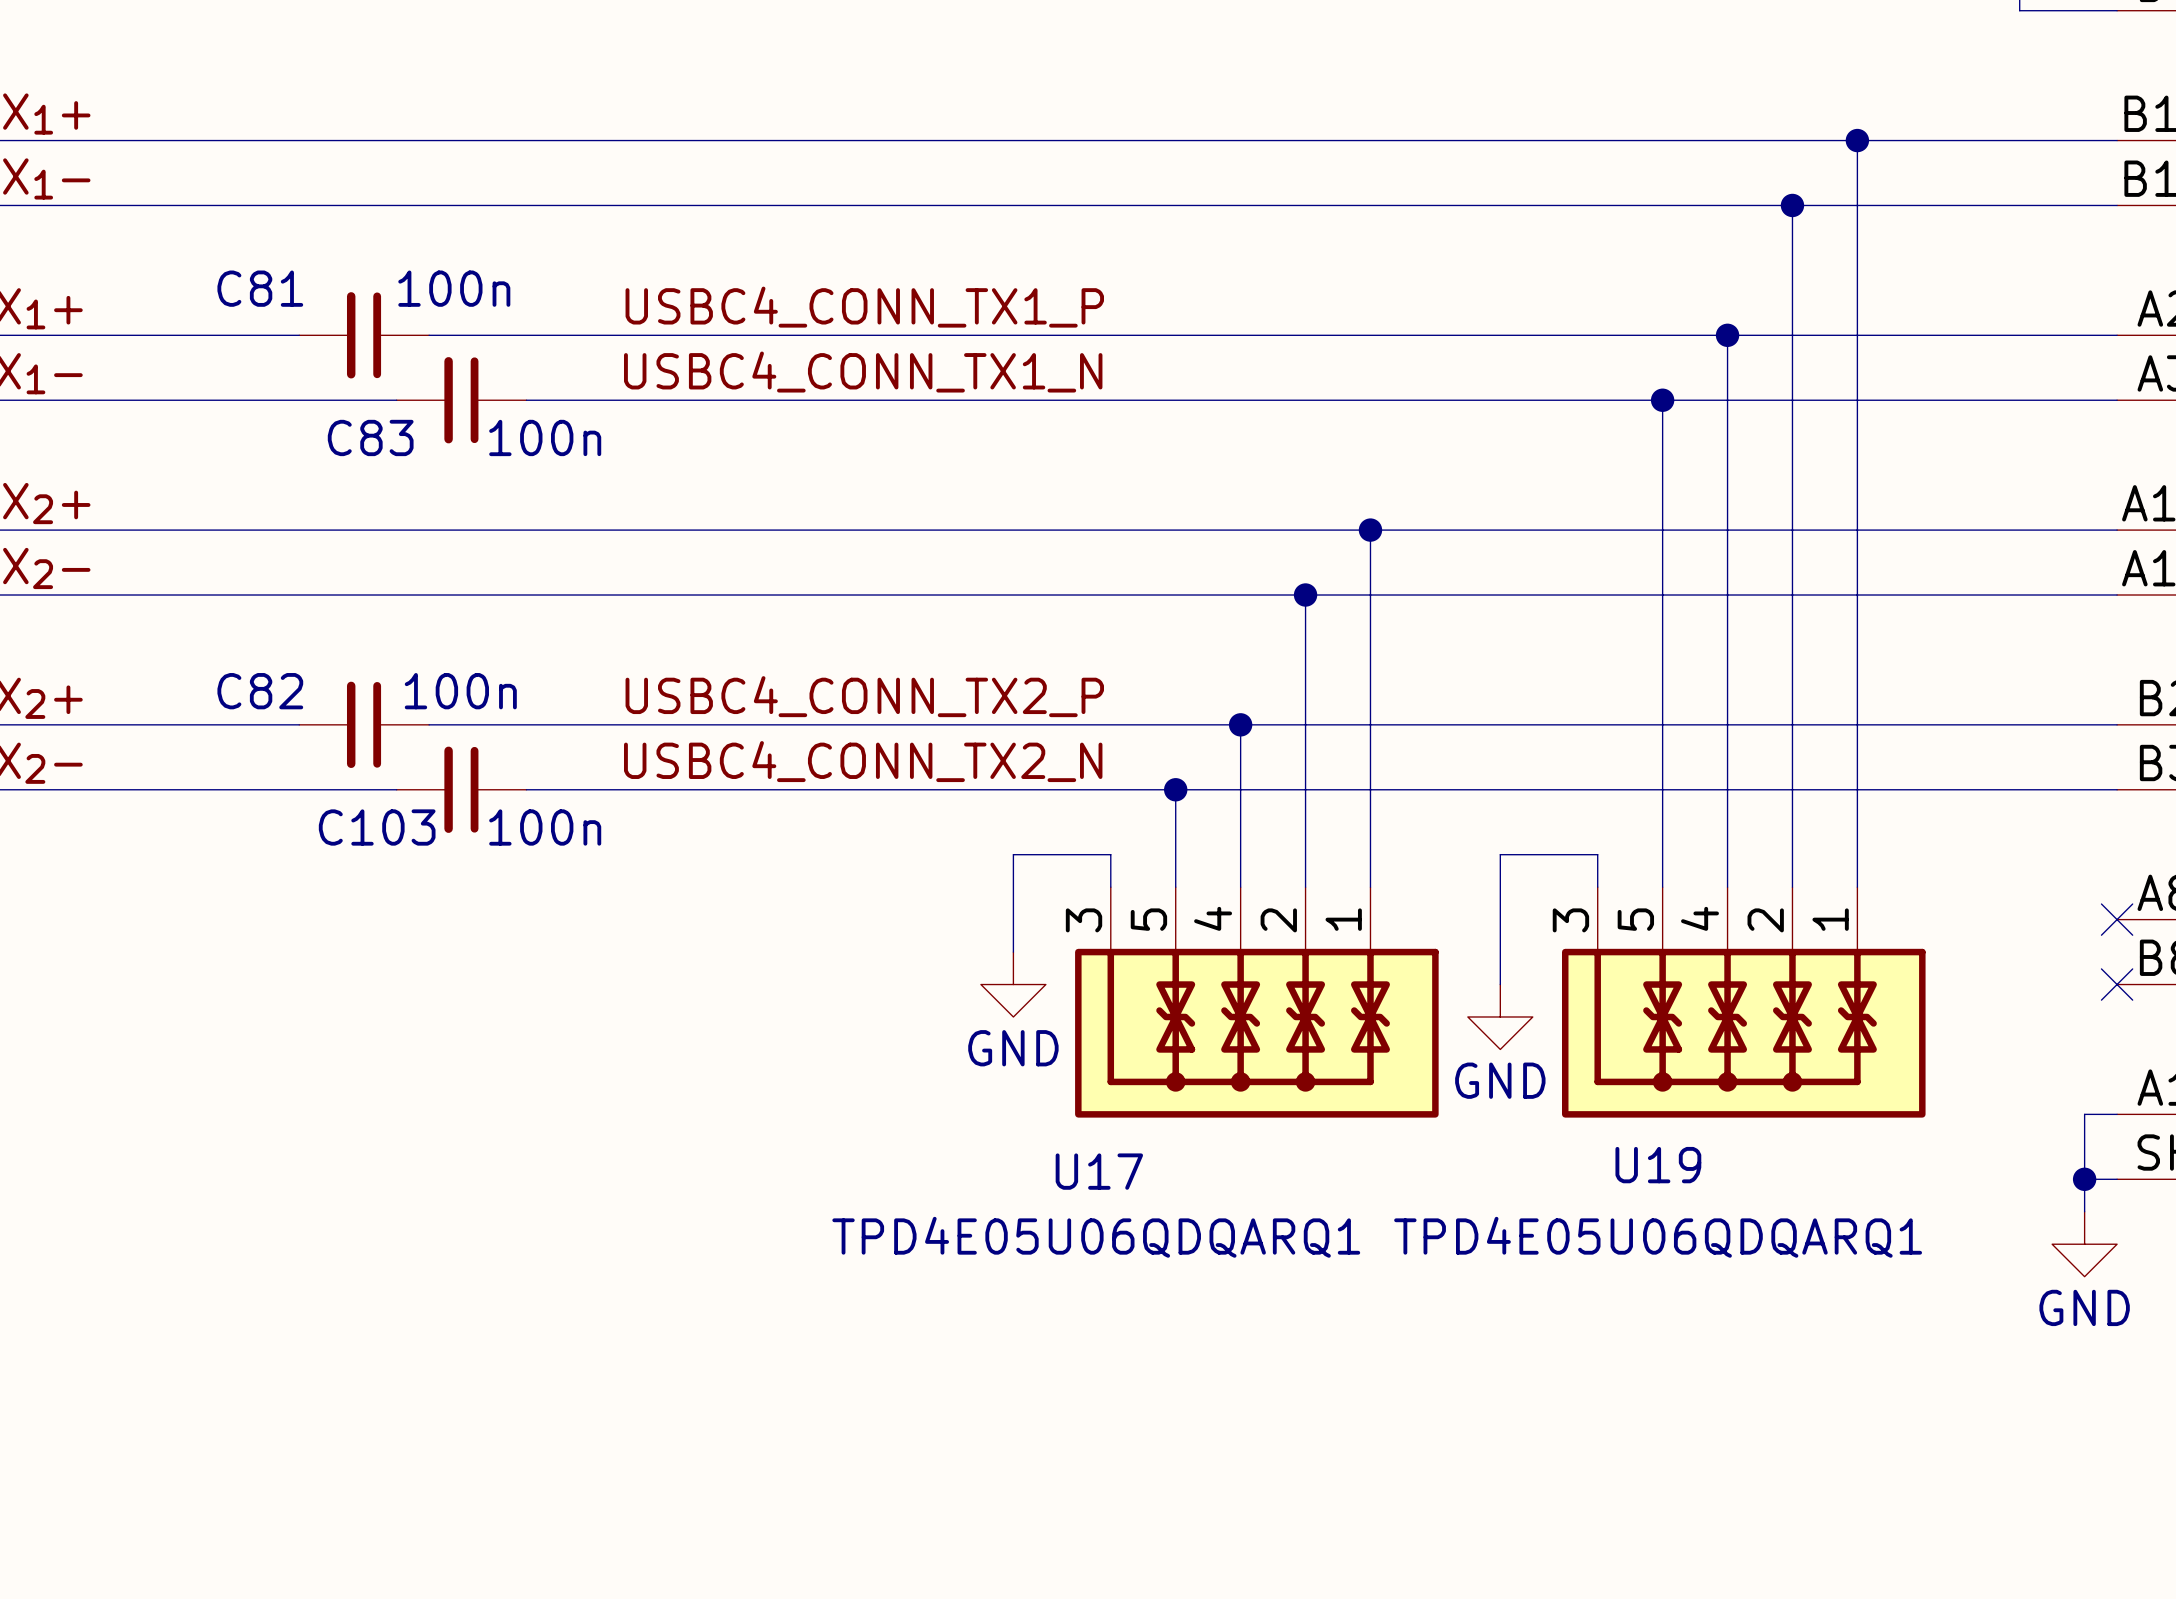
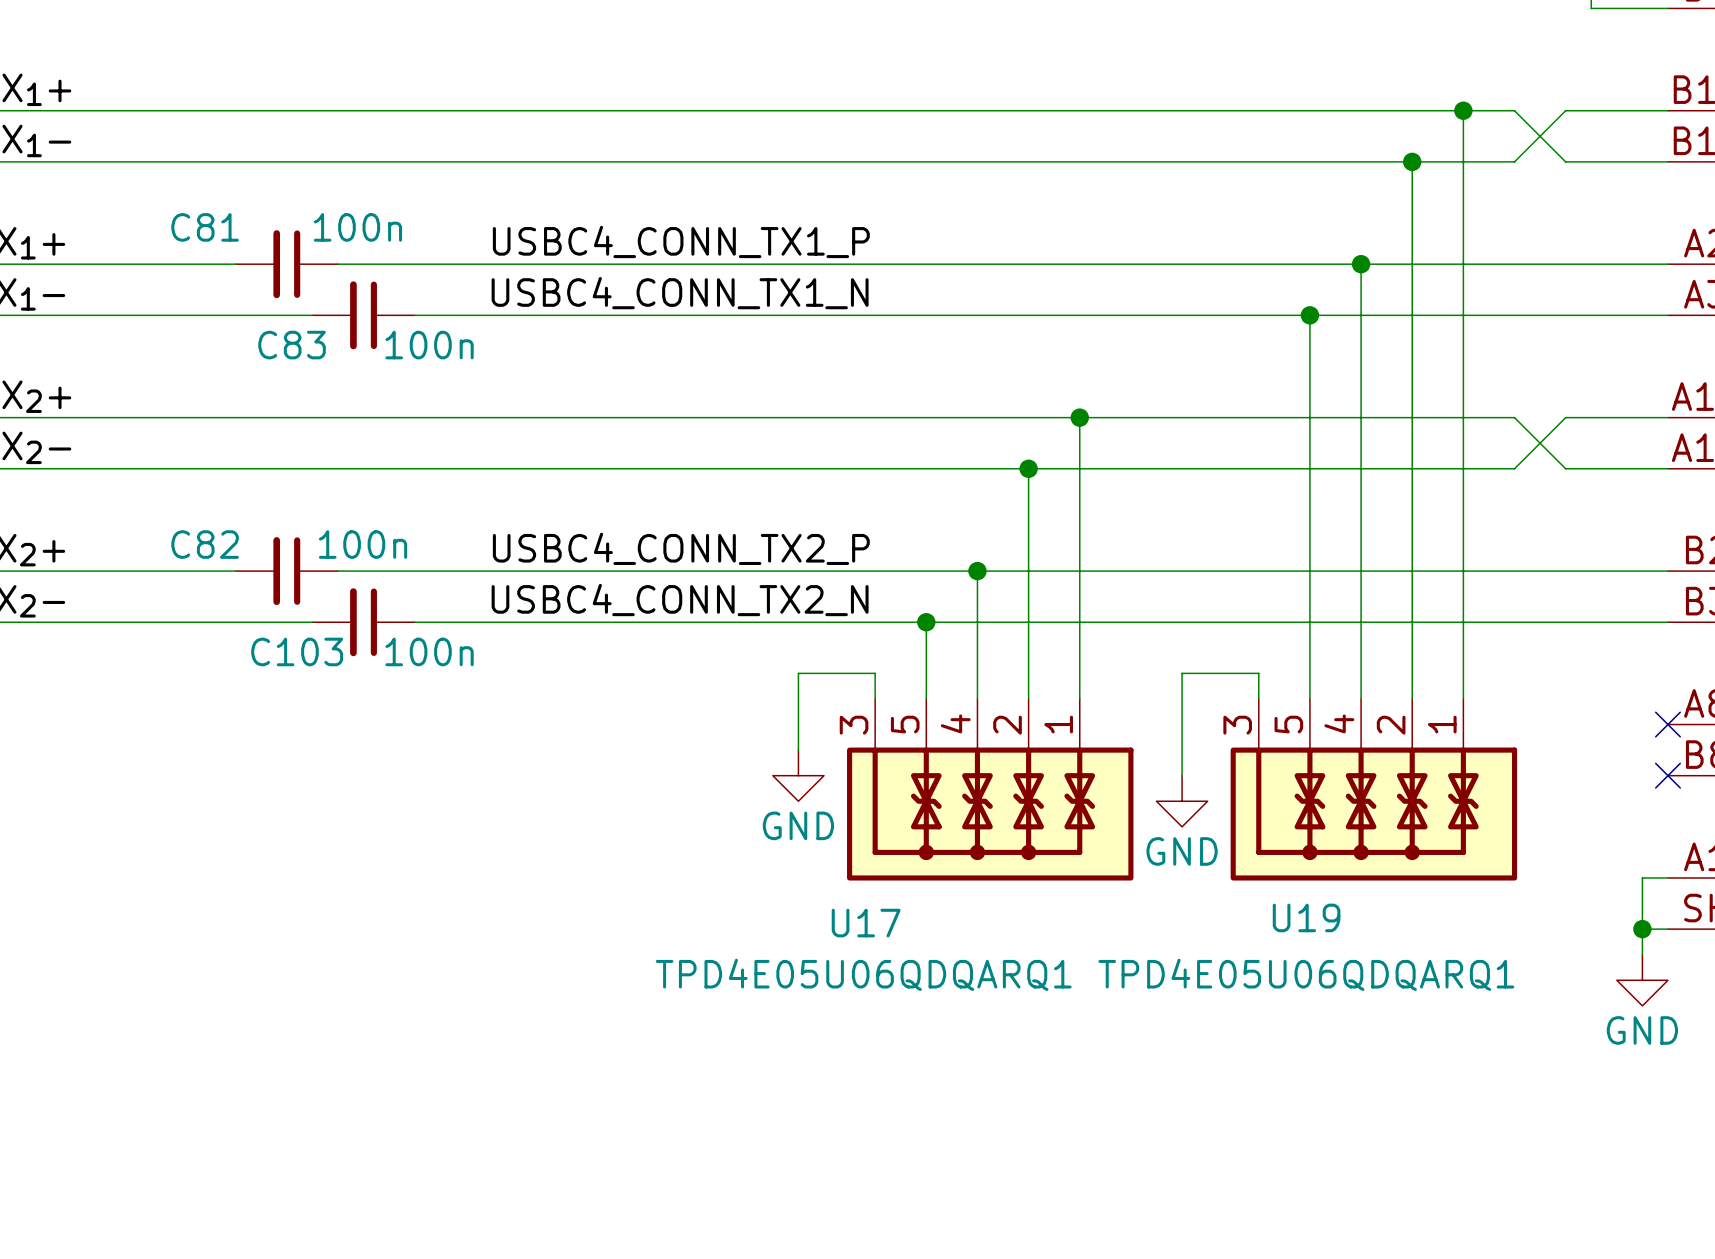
wire: (1922, 140) (1987, 140) -> (1514, 110) (1565, 161)
wire: (1922, 205) (1987, 205) -> (1514, 161) (1565, 110)
wire: (1922, 530) (1987, 530) -> (1514, 417) (1565, 468)
wire: (1922, 595) (1987, 595) -> (1514, 468) (1565, 417)

